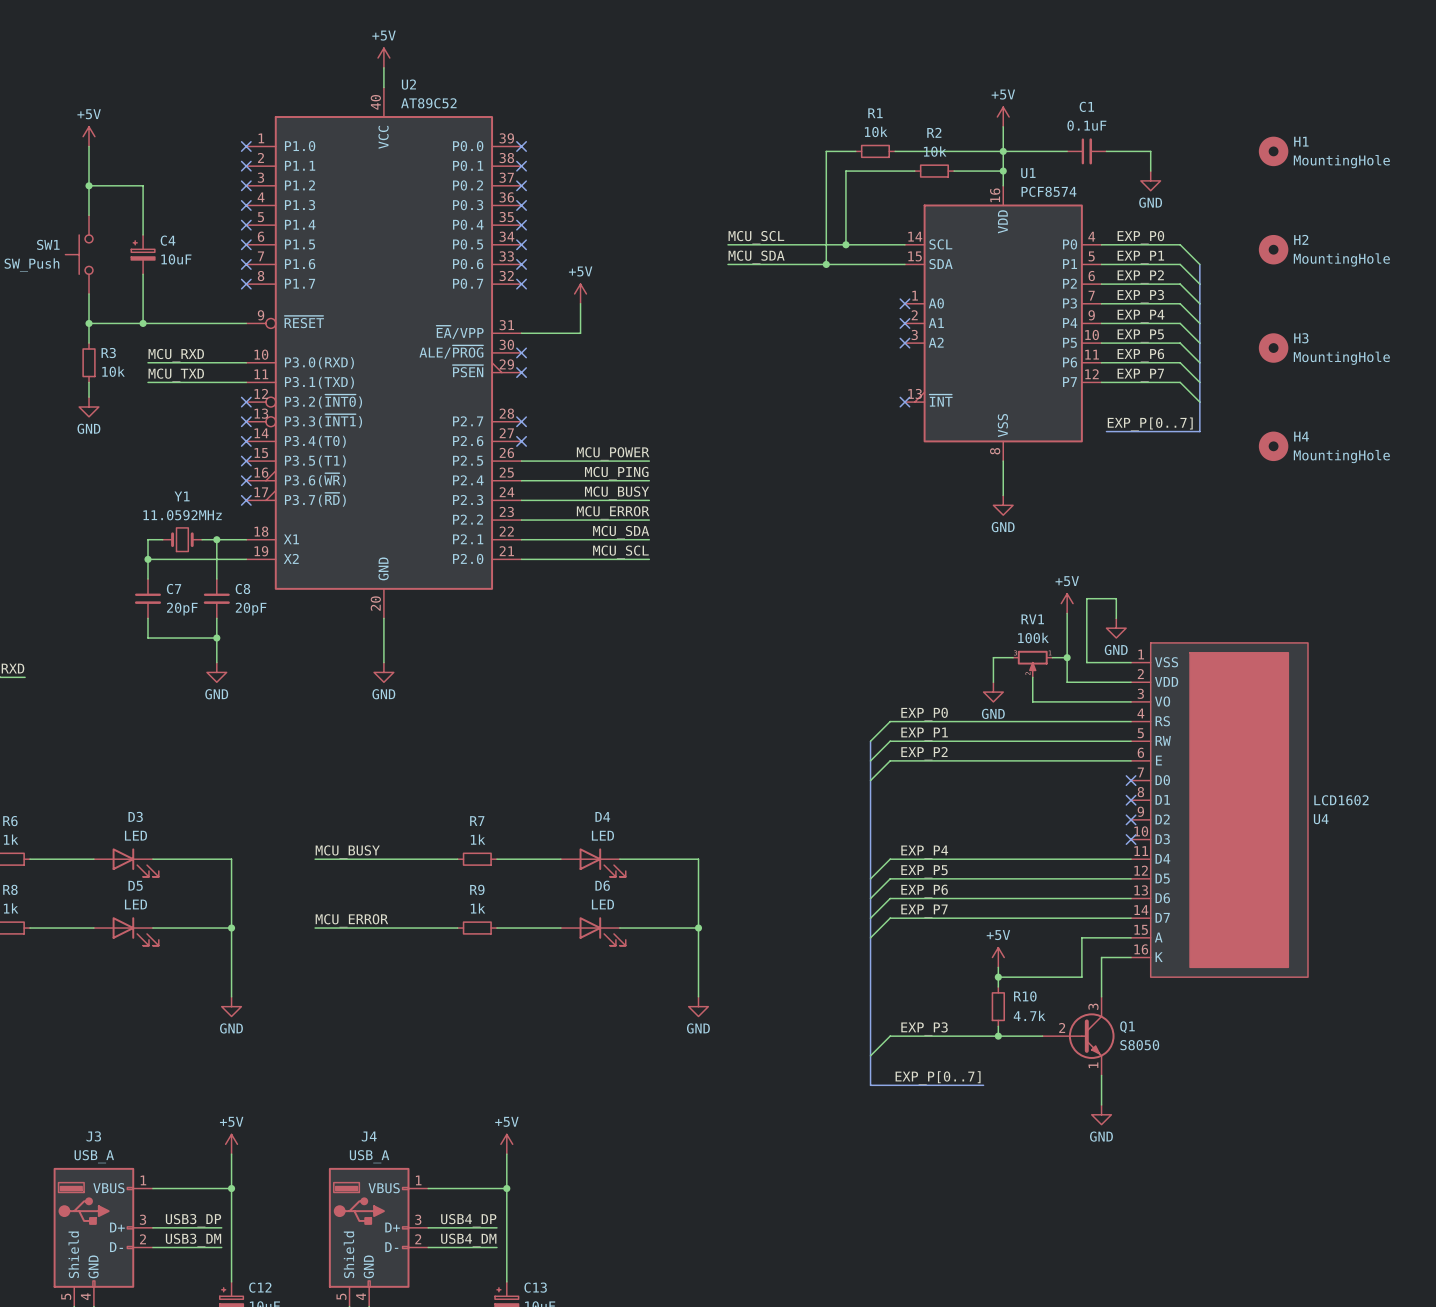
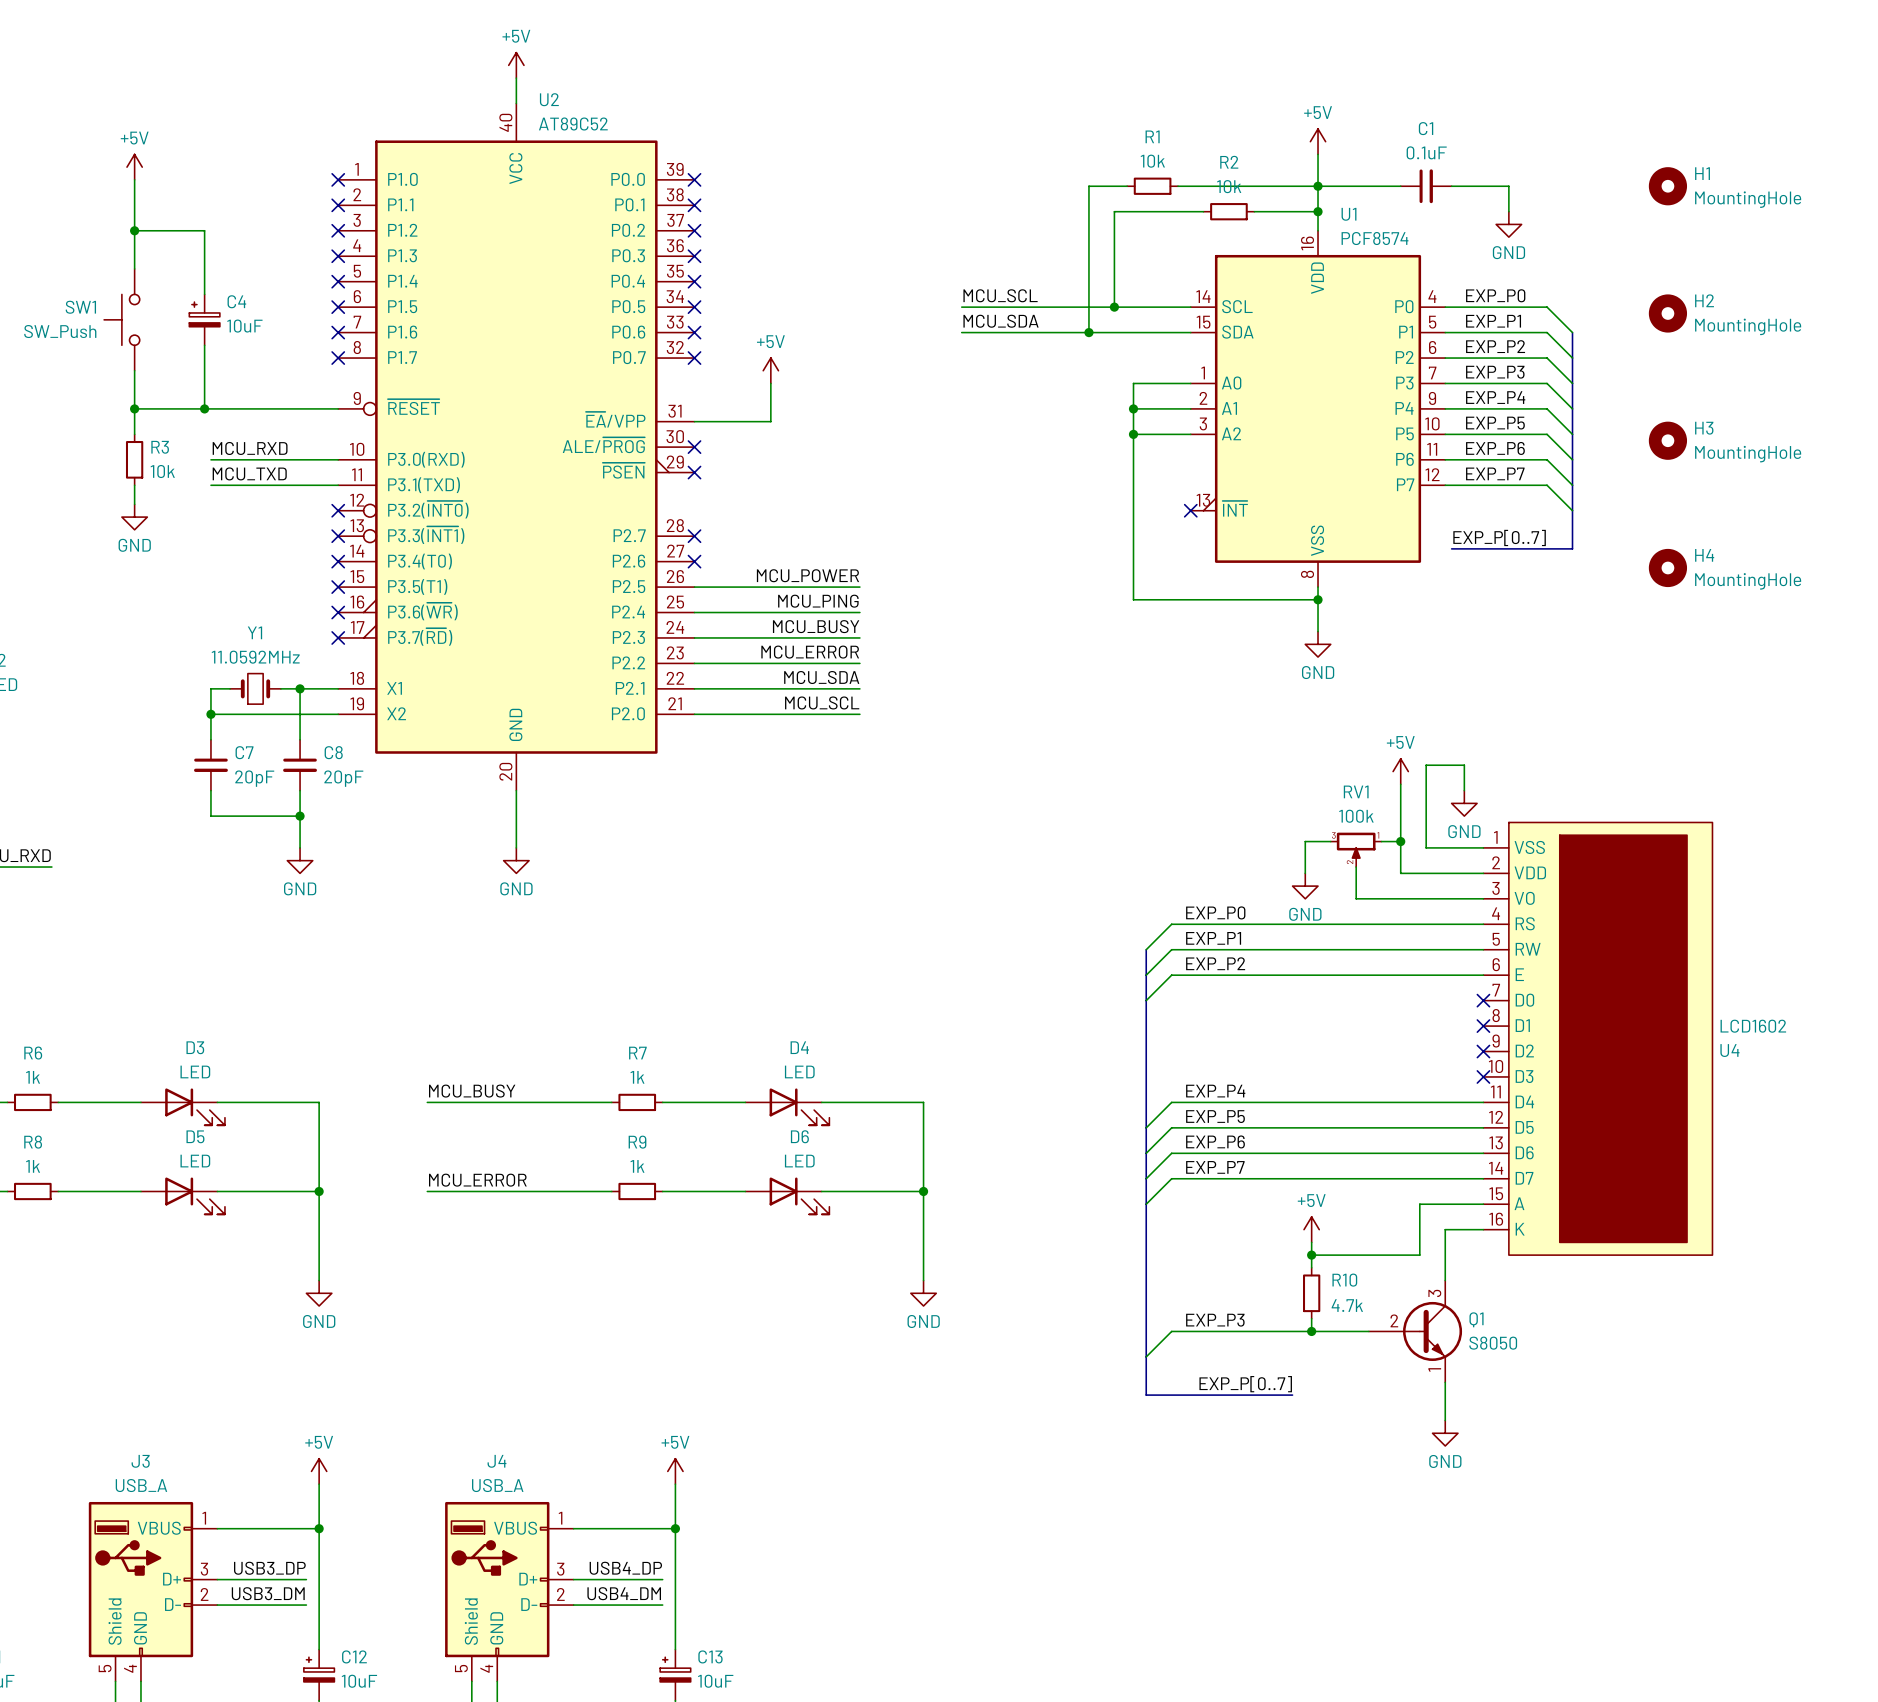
wire: none -> (1190, 383) (1133, 383) (1133, 599) (1318, 599)
no-connect mark: (904, 303) -> none
wire: none -> (1133, 408) (1190, 408)
junction: none -> (1133, 408)
no-connect mark: (904, 323) -> none
wire: none -> (1133, 434) (1190, 434)
junction: none -> (1133, 434)
no-connect mark: (904, 343) -> none
junction: none -> (1318, 599)

